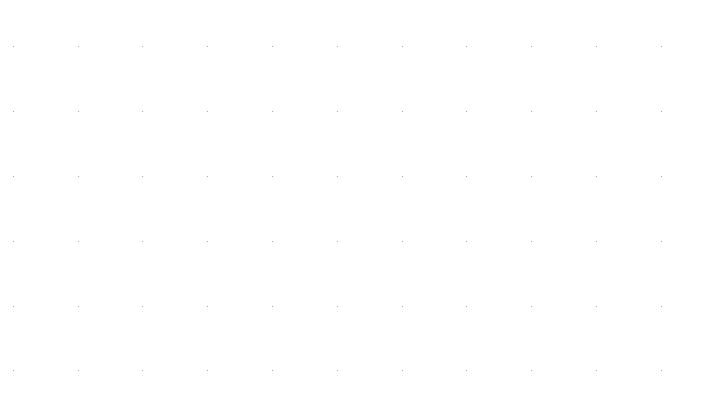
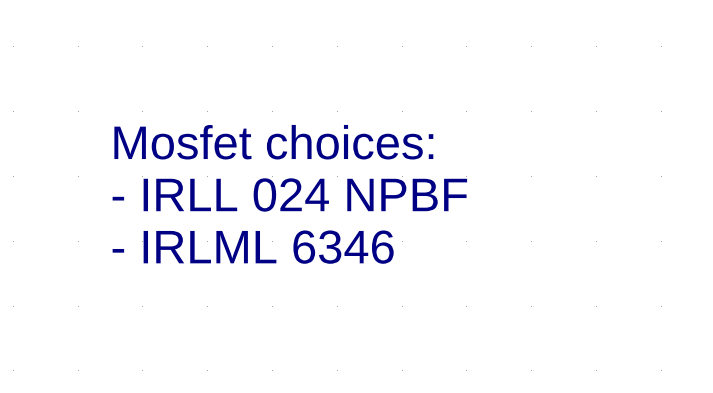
text: none -> Mosfet choices: (273, 142)
text: none -> - IRLL 024 NPBF (289, 194)
text: none -> - IRLML 6346 (253, 247)

